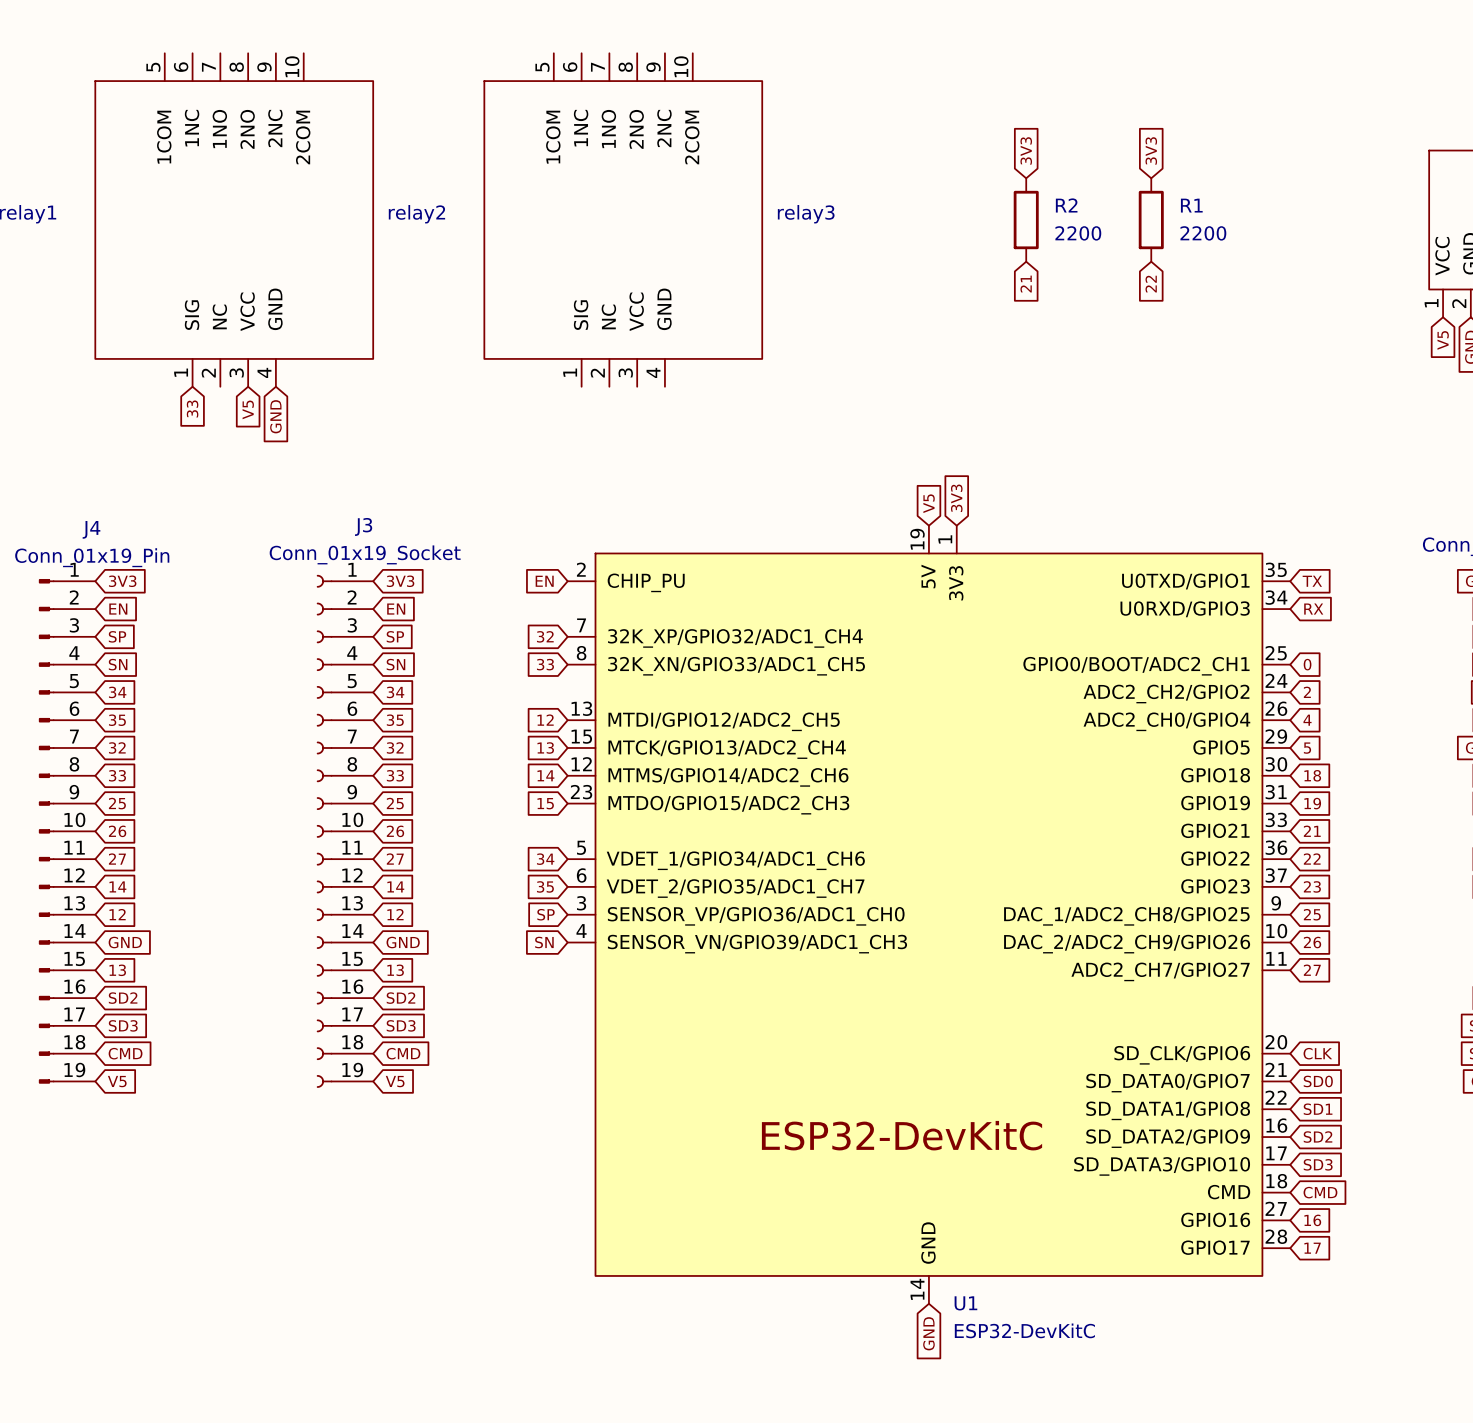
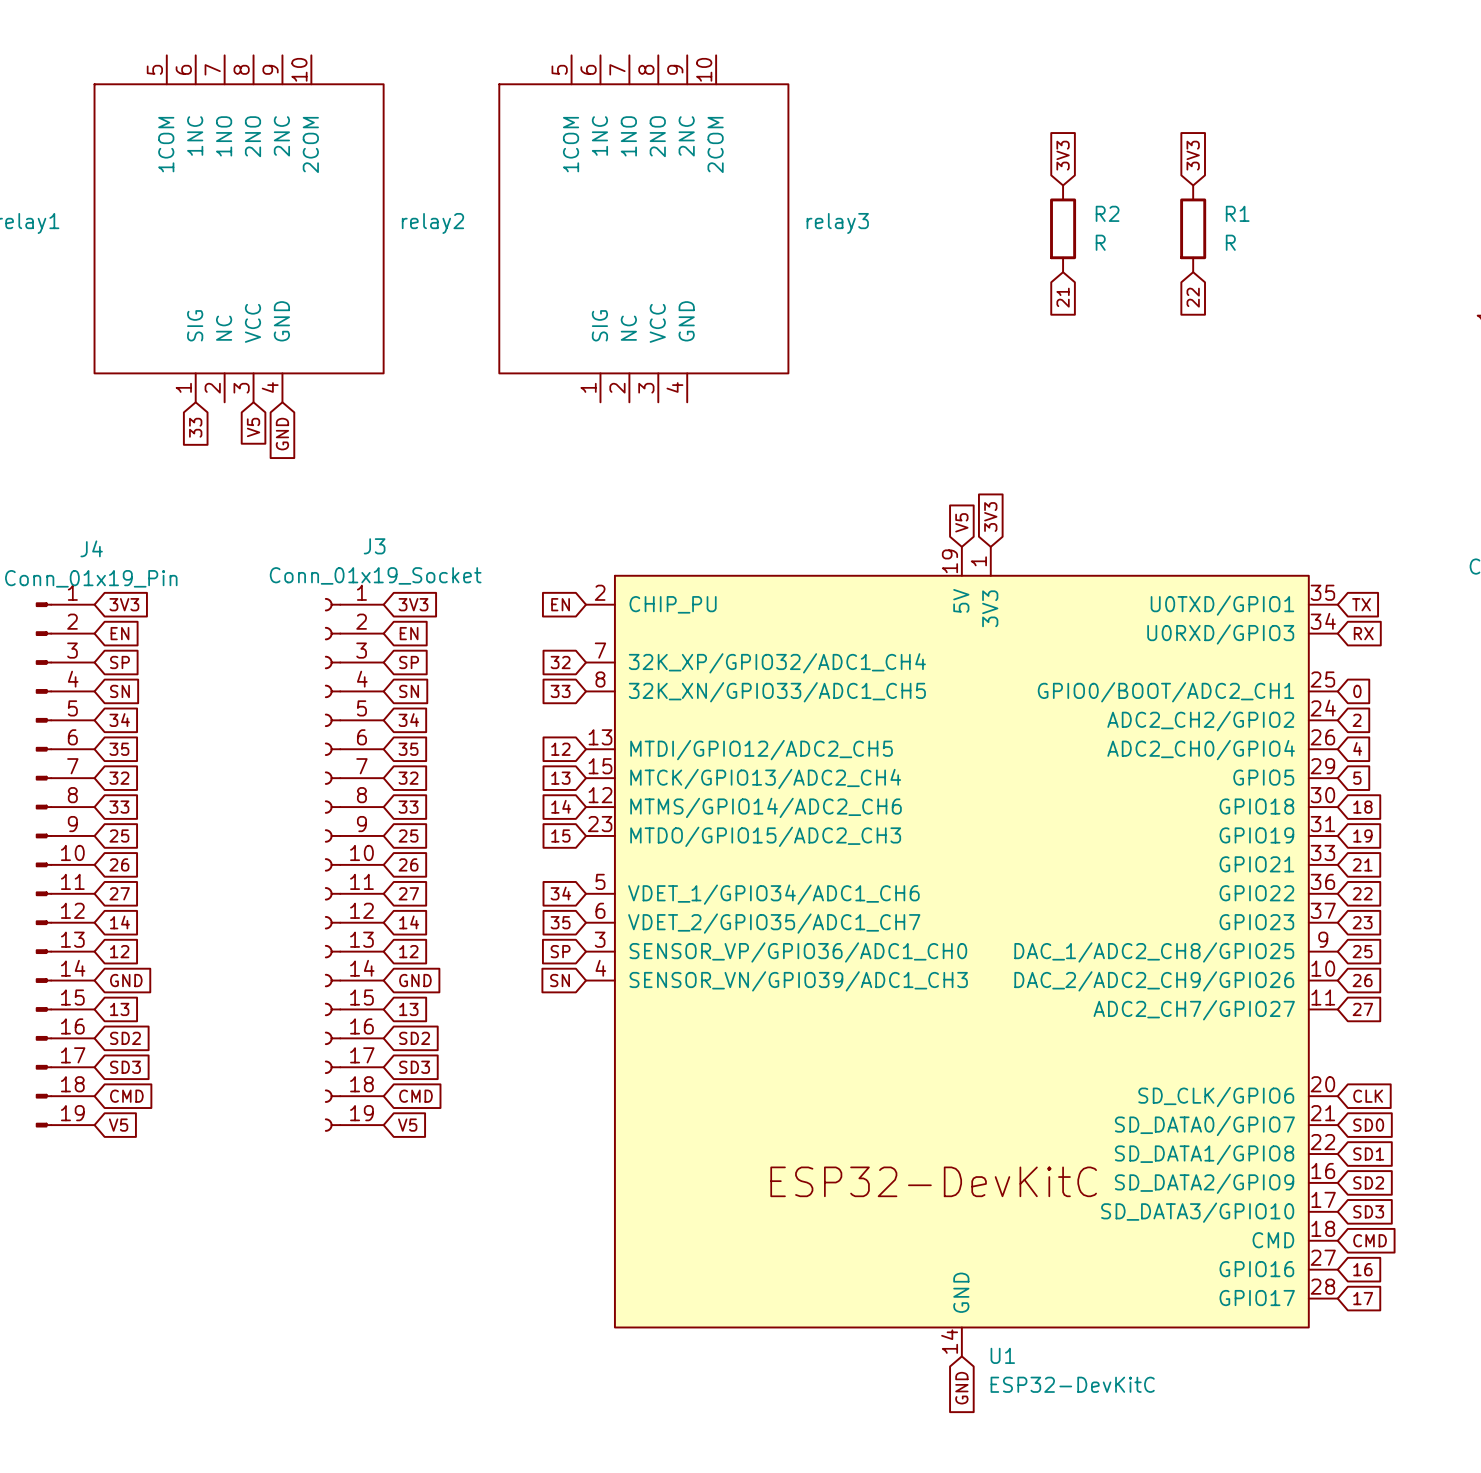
R2 value: 2200 (1078, 233) -> R (1100, 242)
R1 value: 2200 (1203, 233) -> R (1230, 242)

